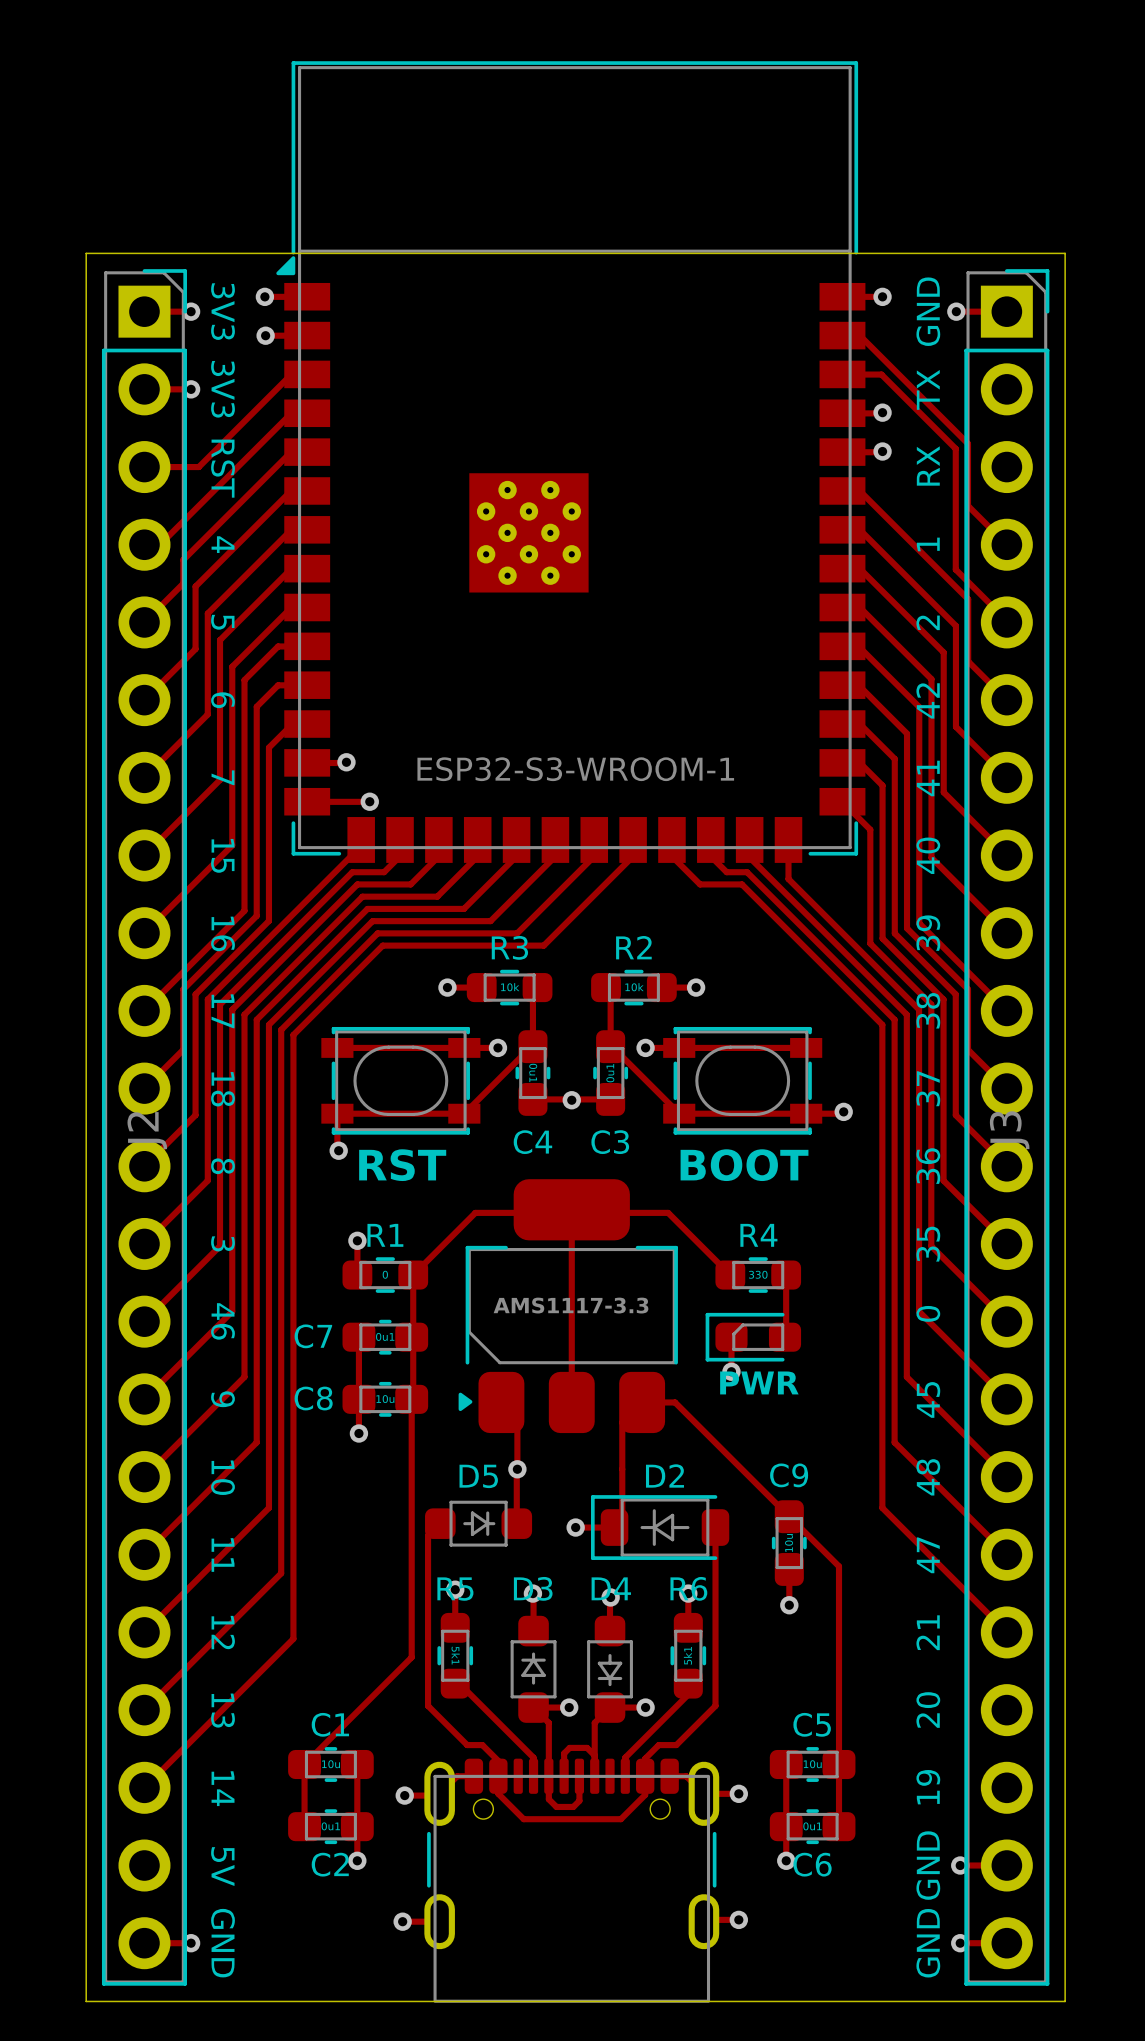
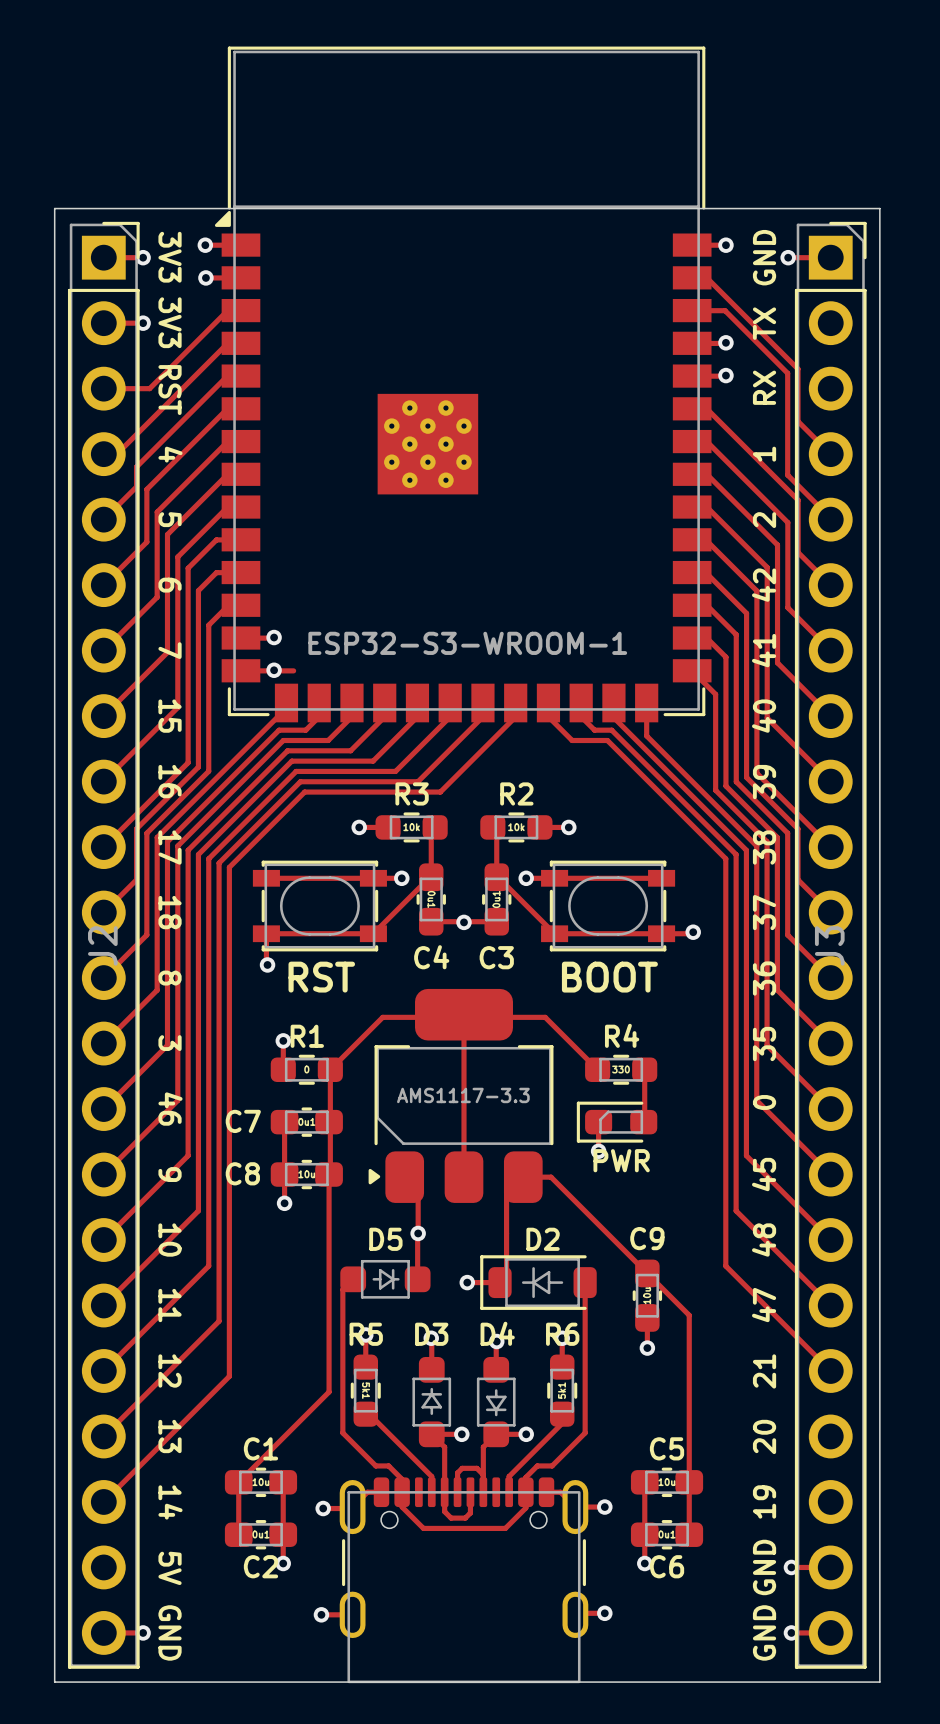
via position: (369, 801) -> (274, 670)

